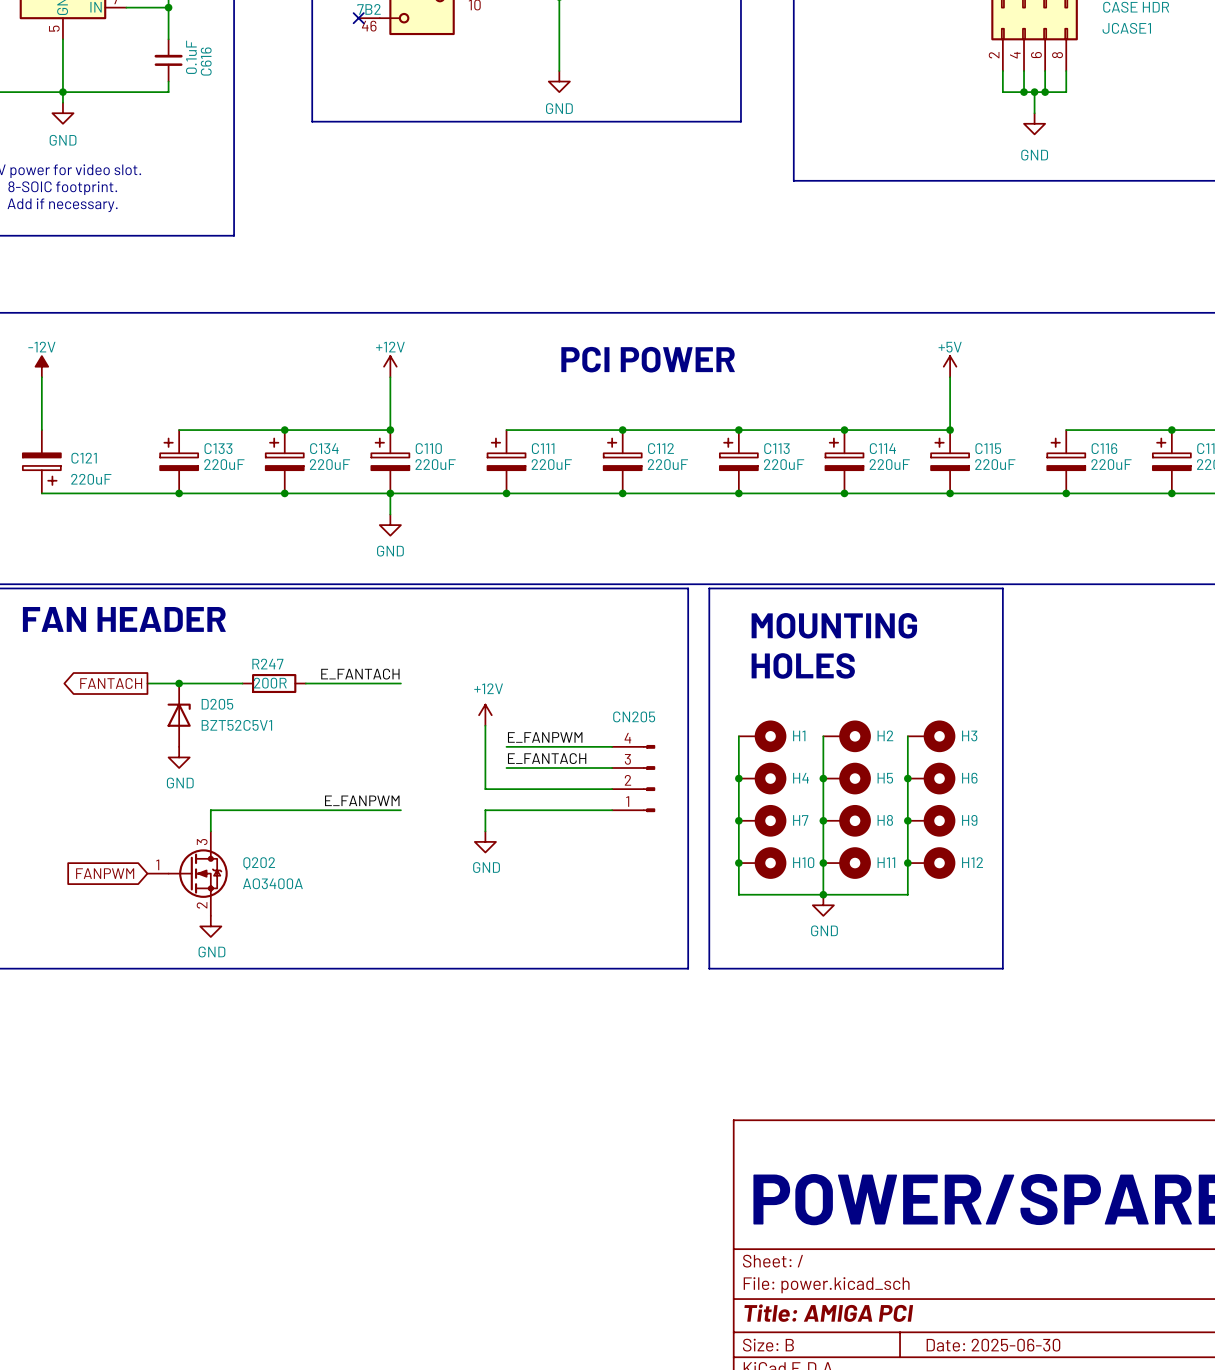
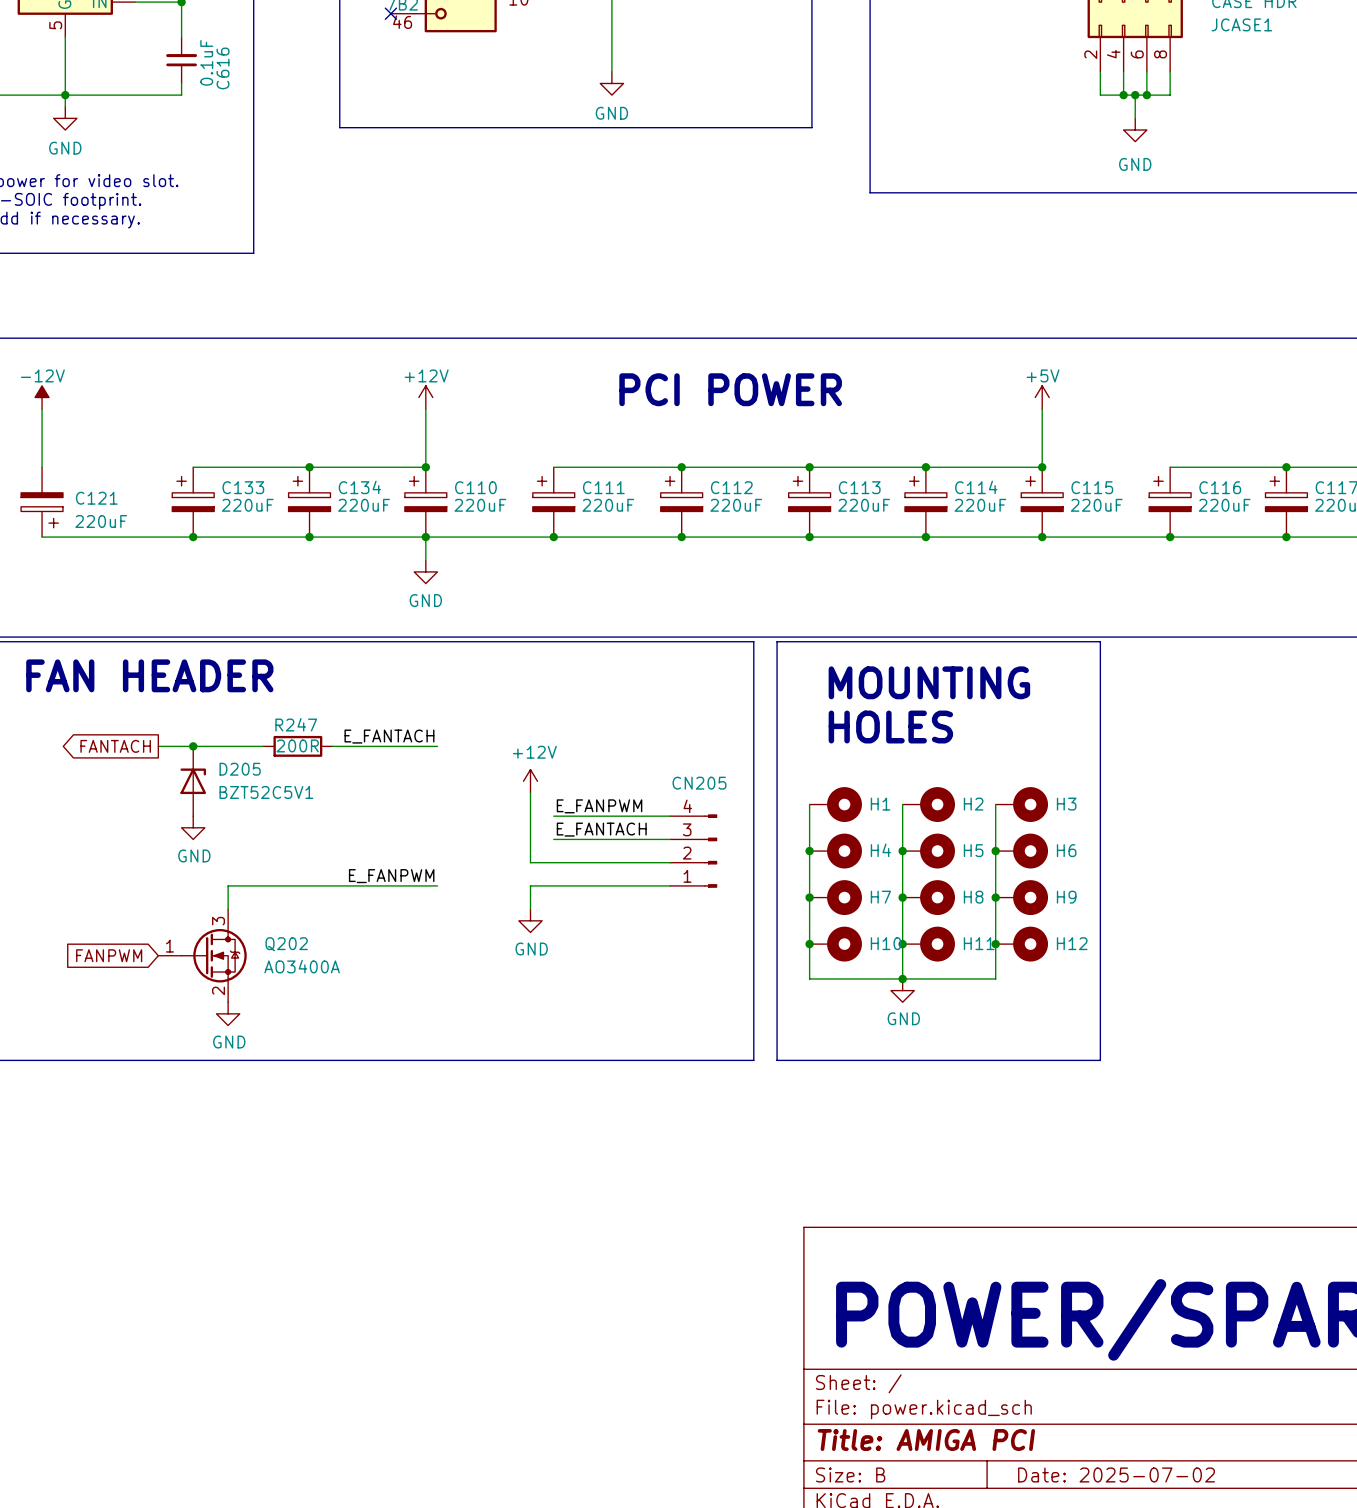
title block: Date: 2025-06-30 (993, 1345) -> Date: 2025-07-02 (1116, 1474)

